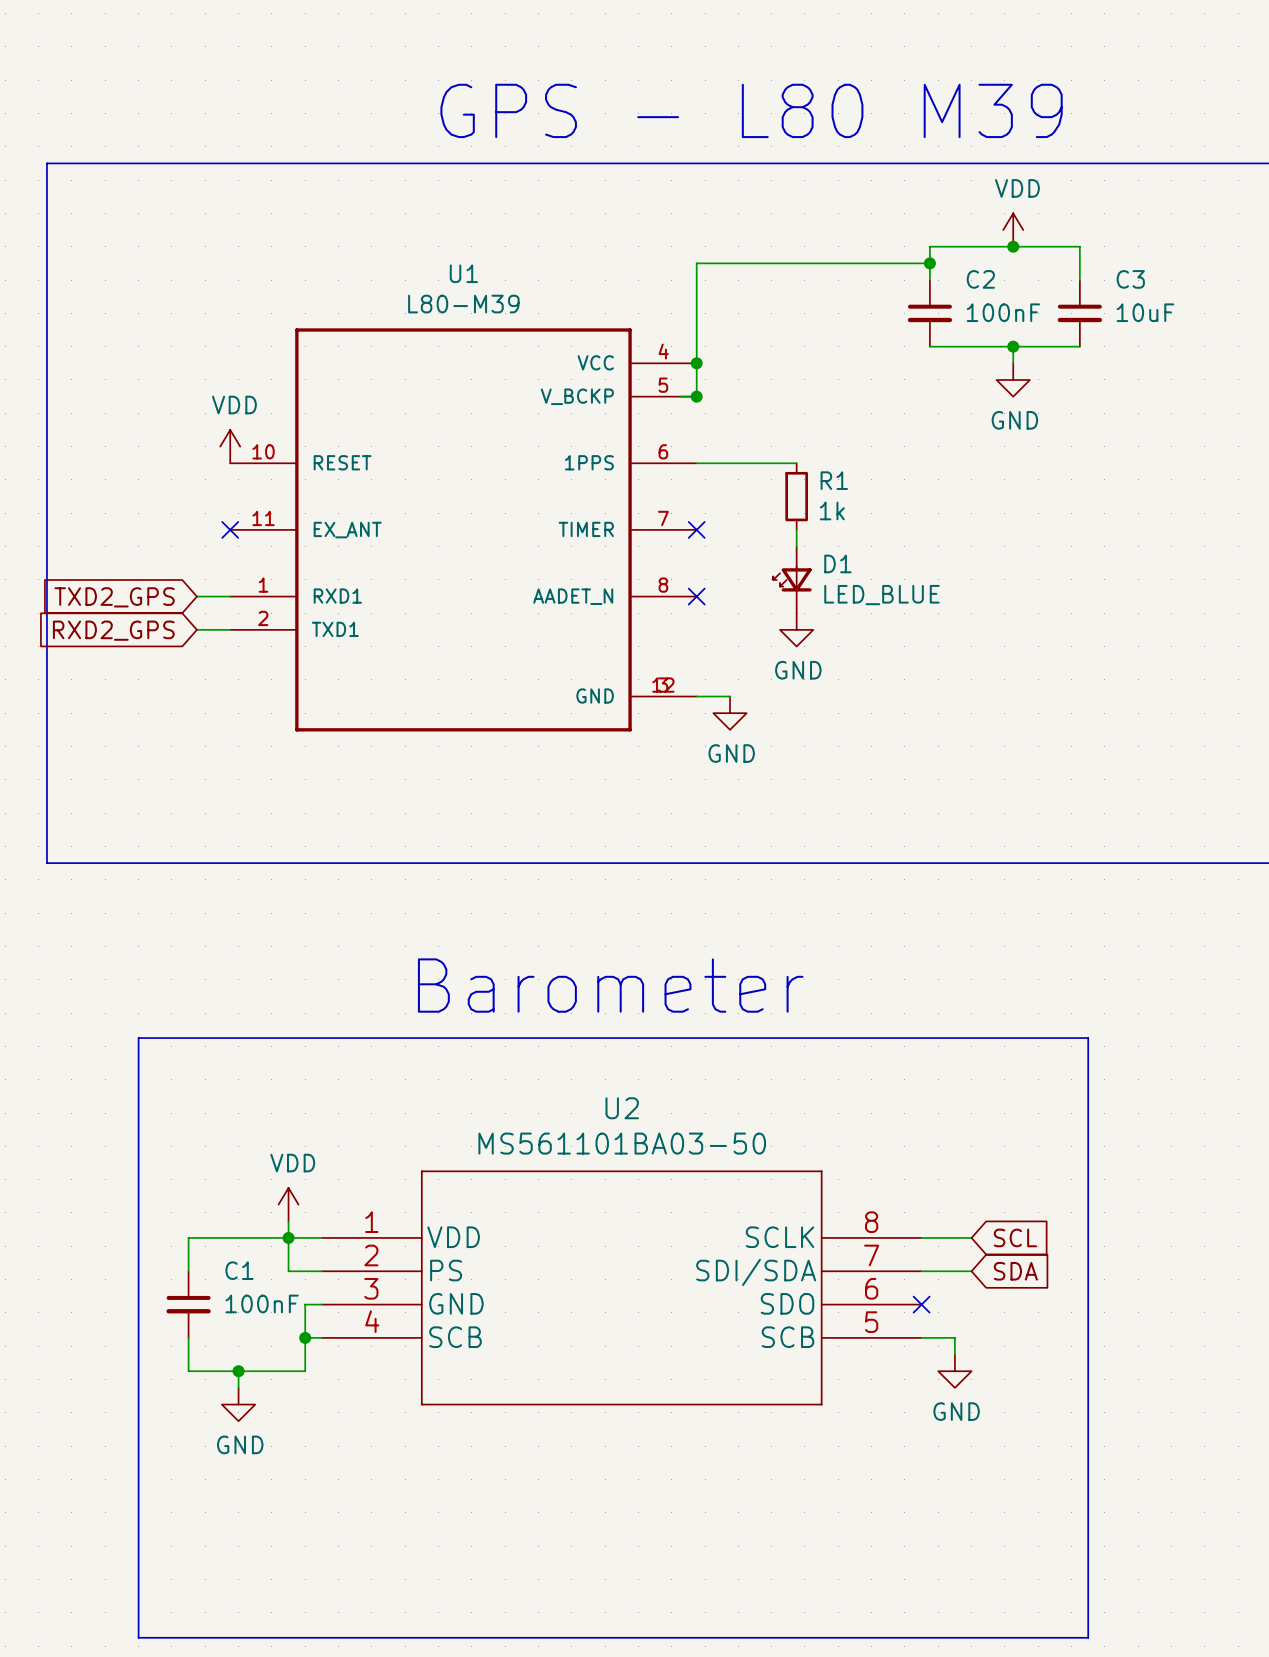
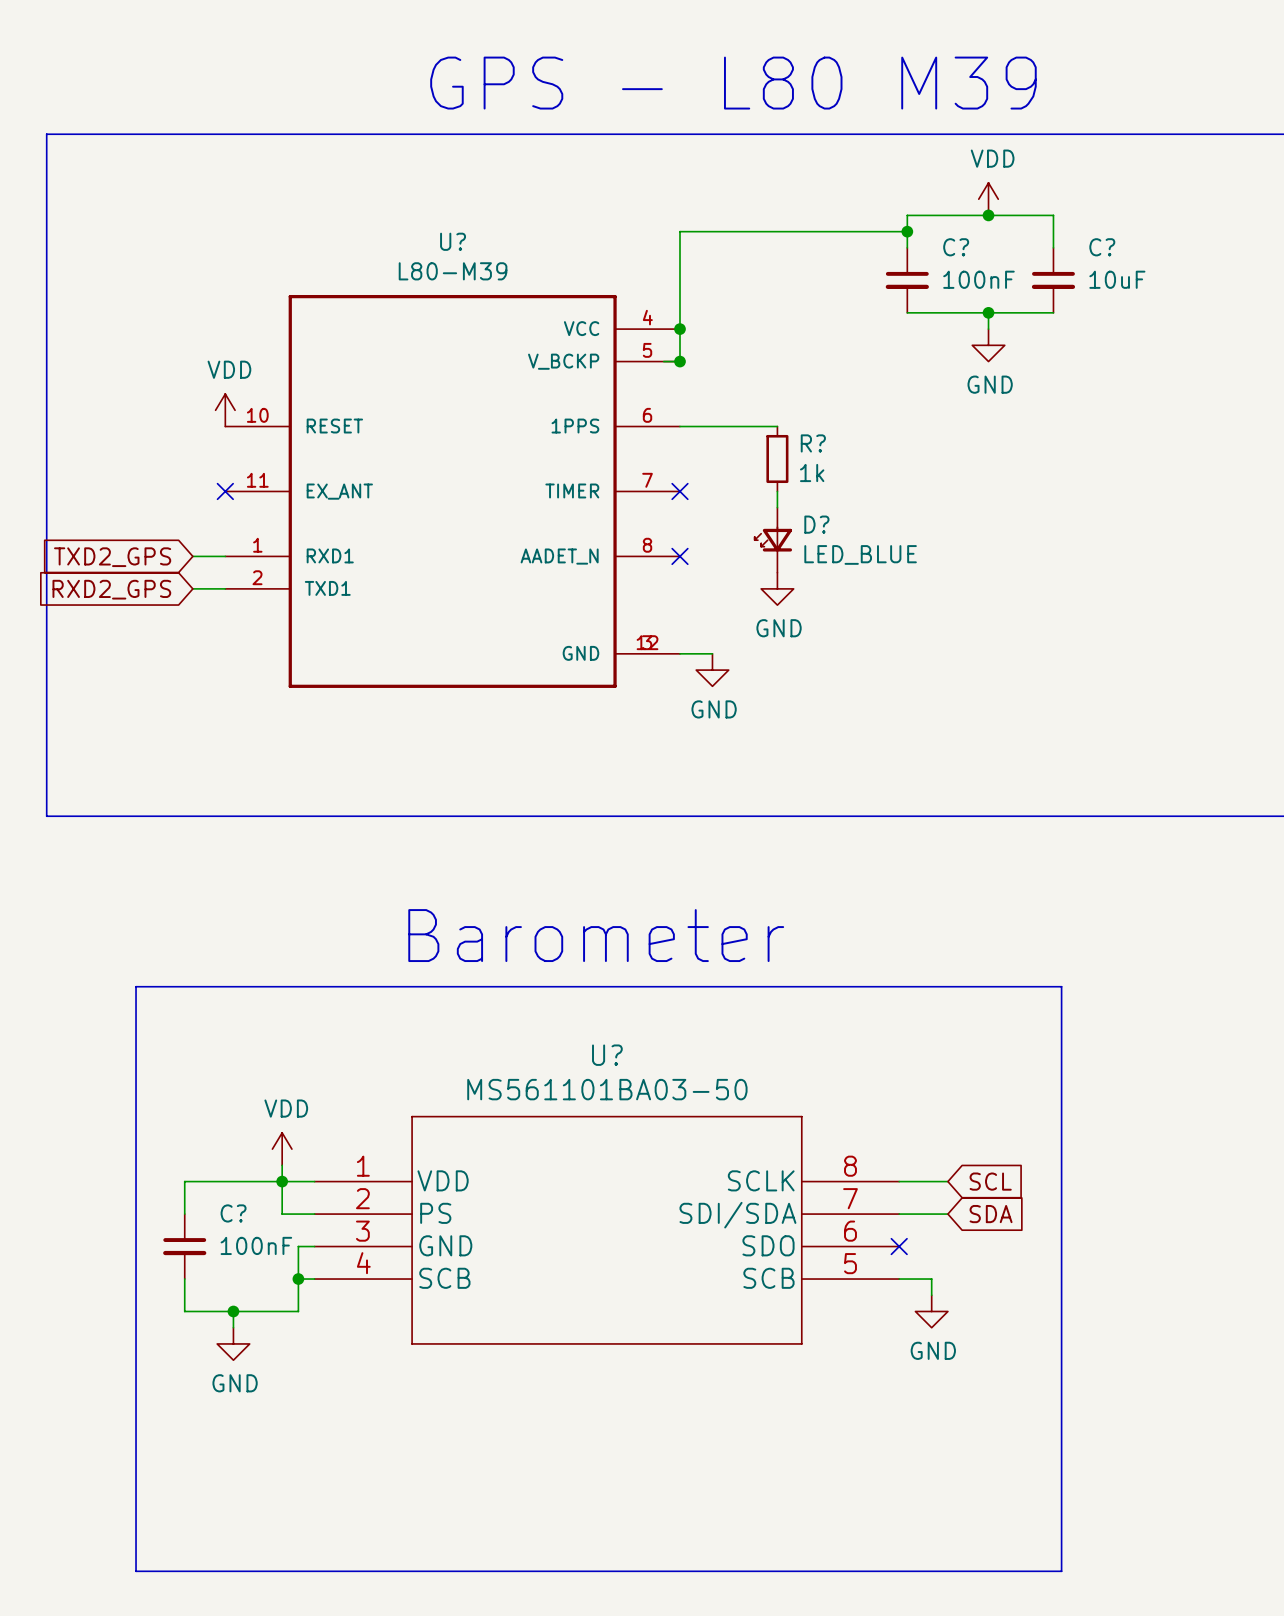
U1 name: U1 (463, 273) -> U? (453, 241)
C2 name: C2 (980, 279) -> C? (956, 247)
C3 name: C3 (1130, 279) -> C? (1102, 247)
R1 name: R1 (834, 480) -> R? (813, 443)
D1 name: D1 (837, 563) -> D? (816, 524)
U2 name: U2 (622, 1108) -> U? (607, 1055)
C1 name: C1 (239, 1270) -> C? (233, 1213)

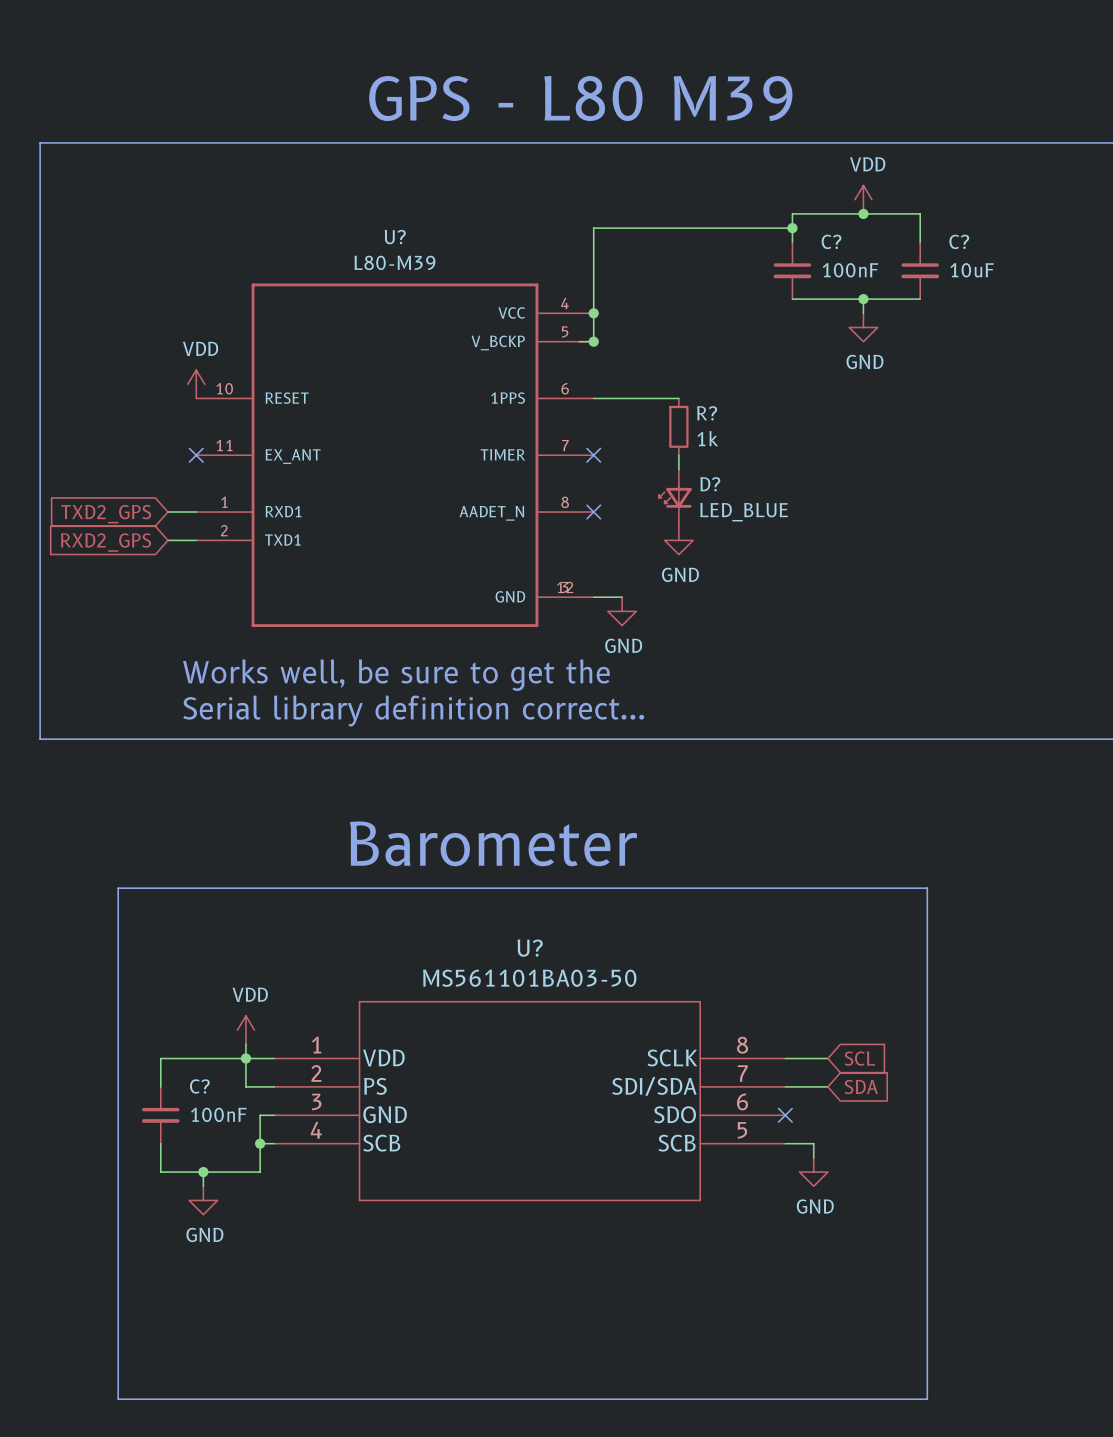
text: none -> Works well, be sure to get the (396, 675)
text: none -> Serial library definition correct... (413, 710)

